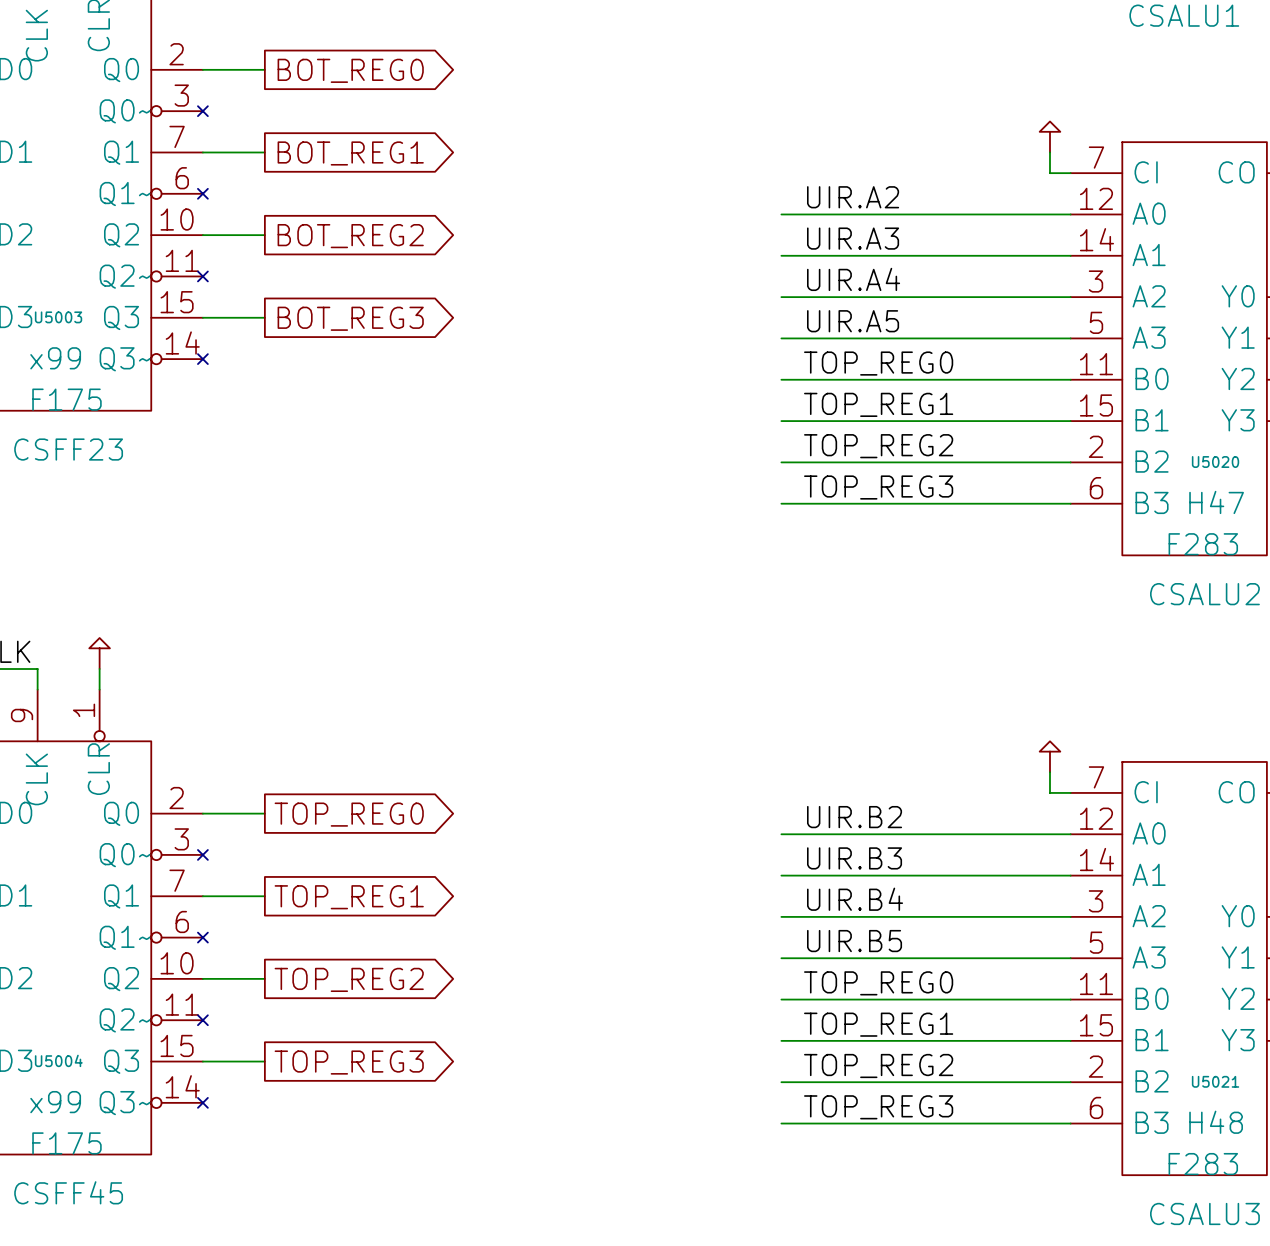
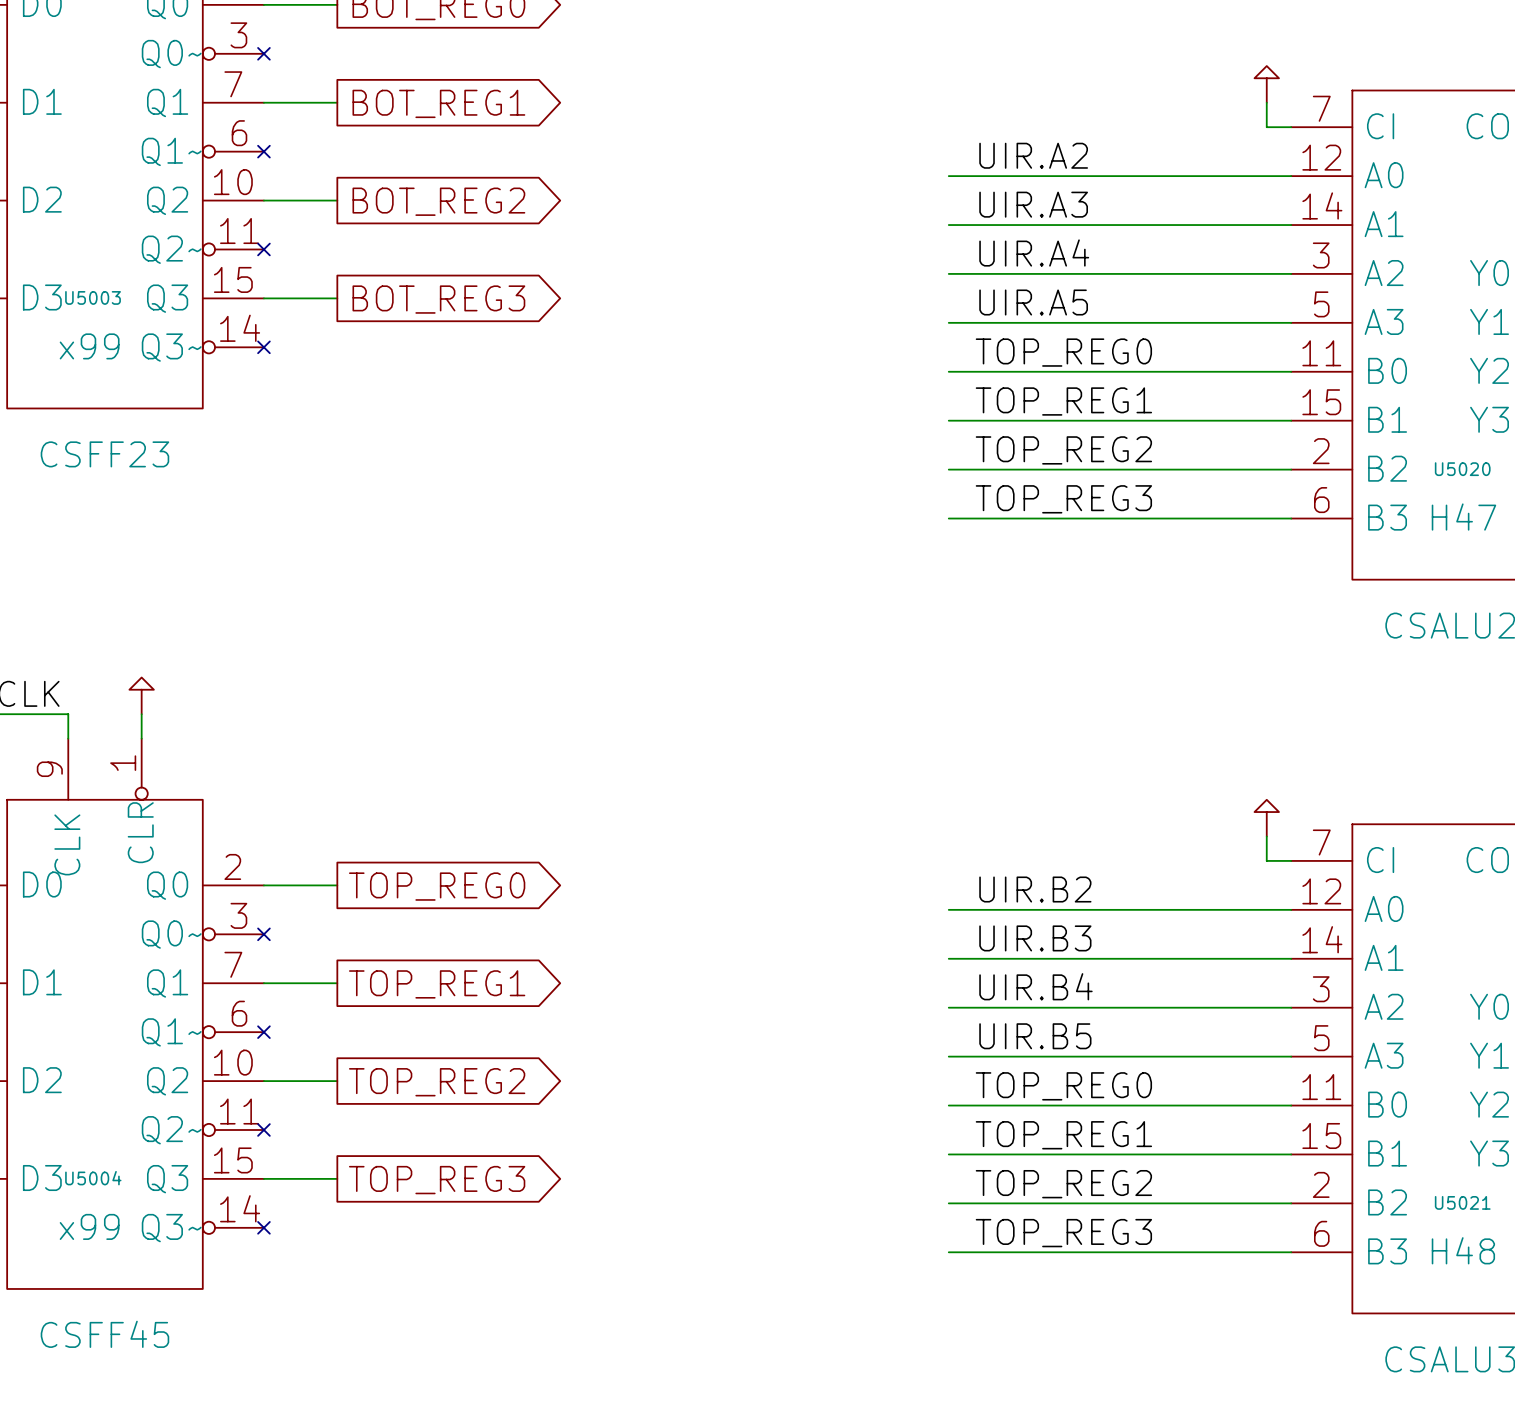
U5003 value: F175 (66, 399) -> none
U5020 value: F283 (1203, 544) -> none
U5004 value: F175 (66, 1143) -> none
U5021 value: F283 (1203, 1164) -> none

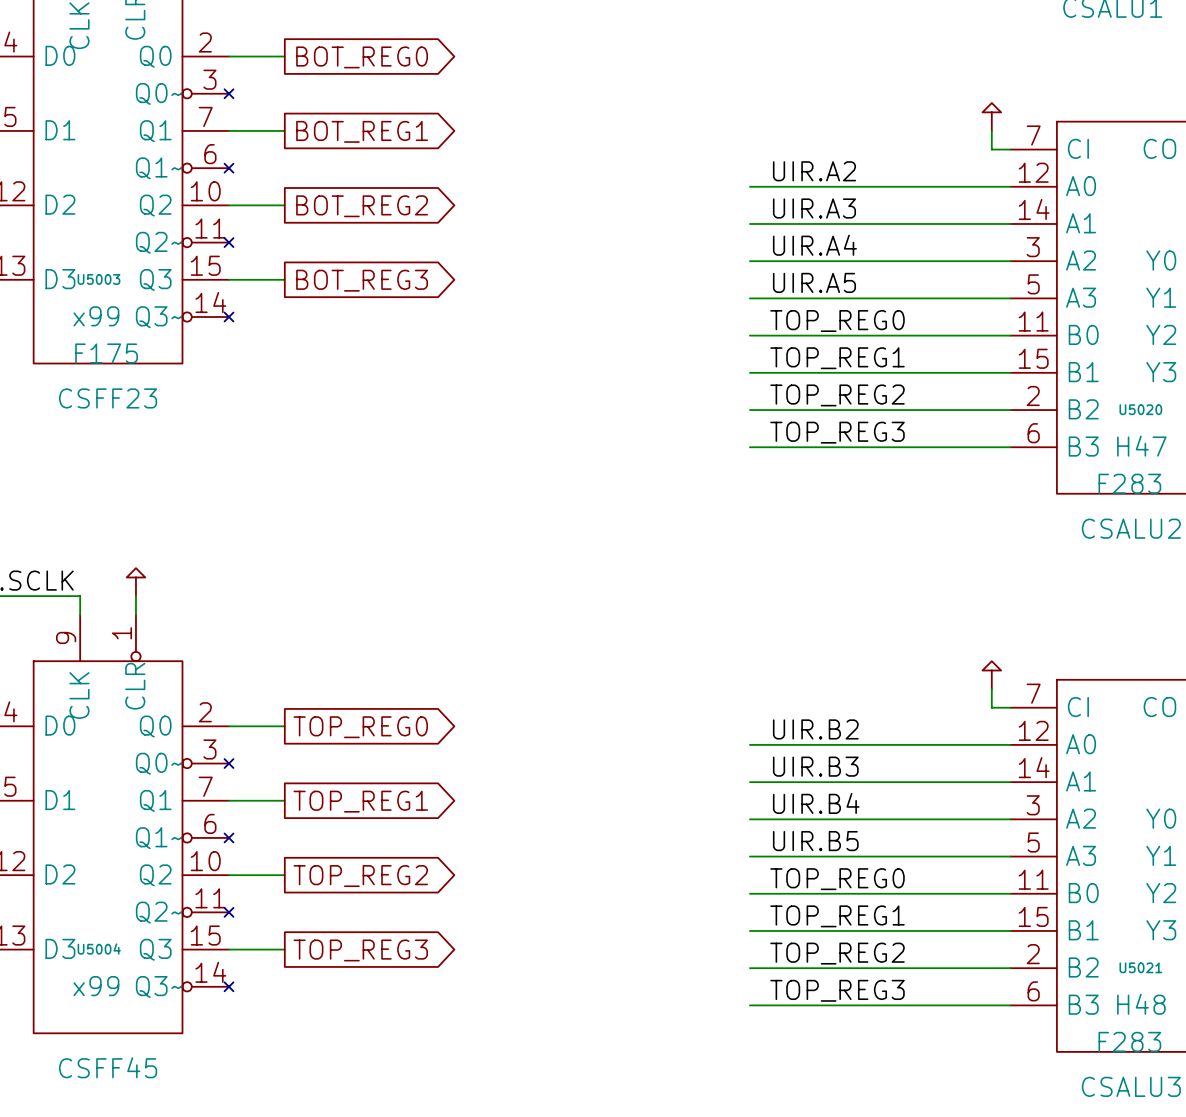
U5003 value: none -> F175 (106, 353)
U5020 value: none -> F283 (1129, 483)
U5021 value: none -> F283 (1129, 1041)

